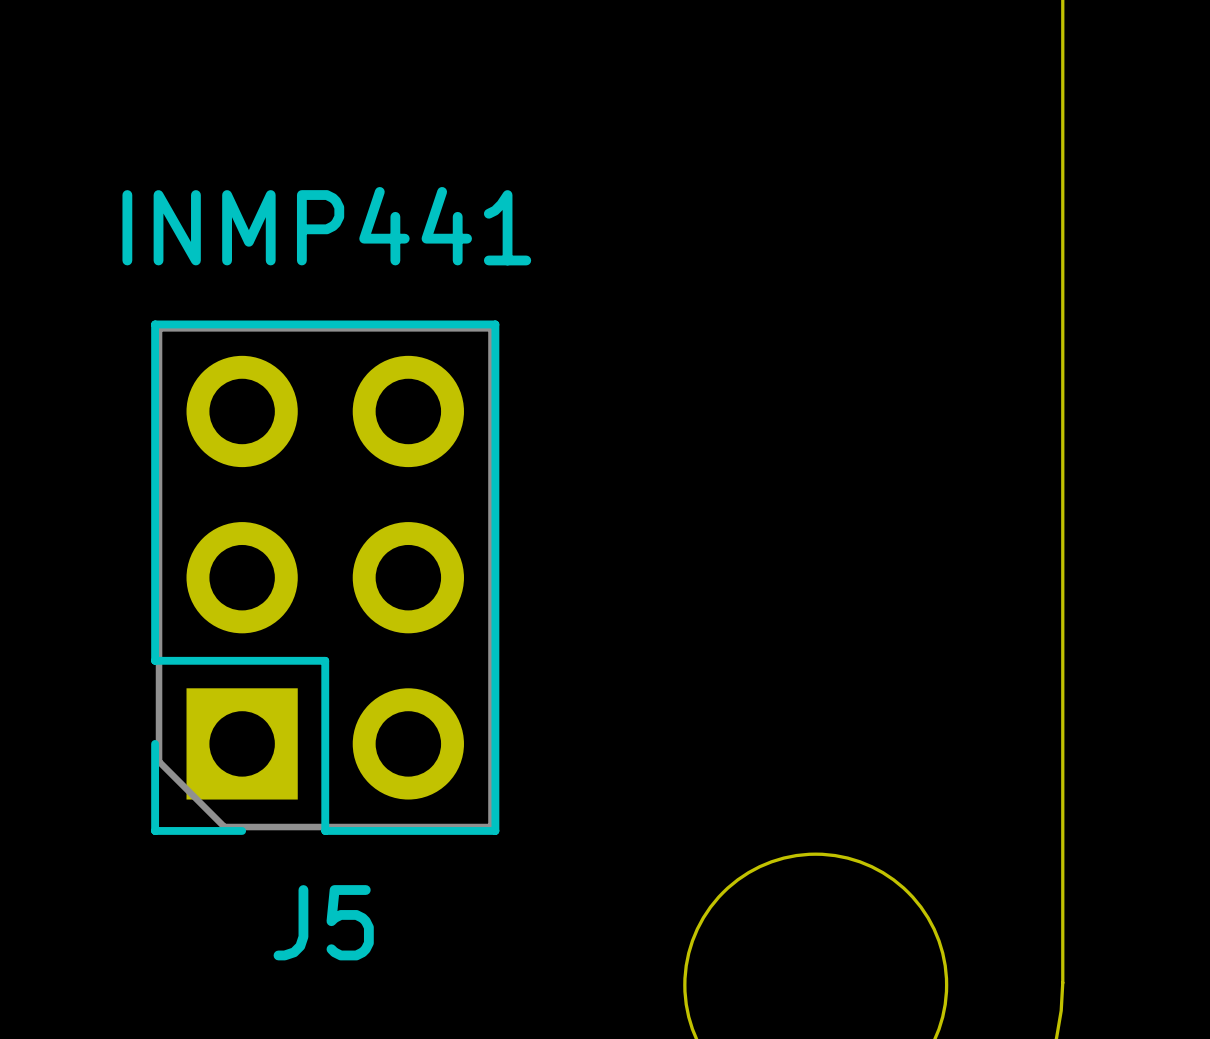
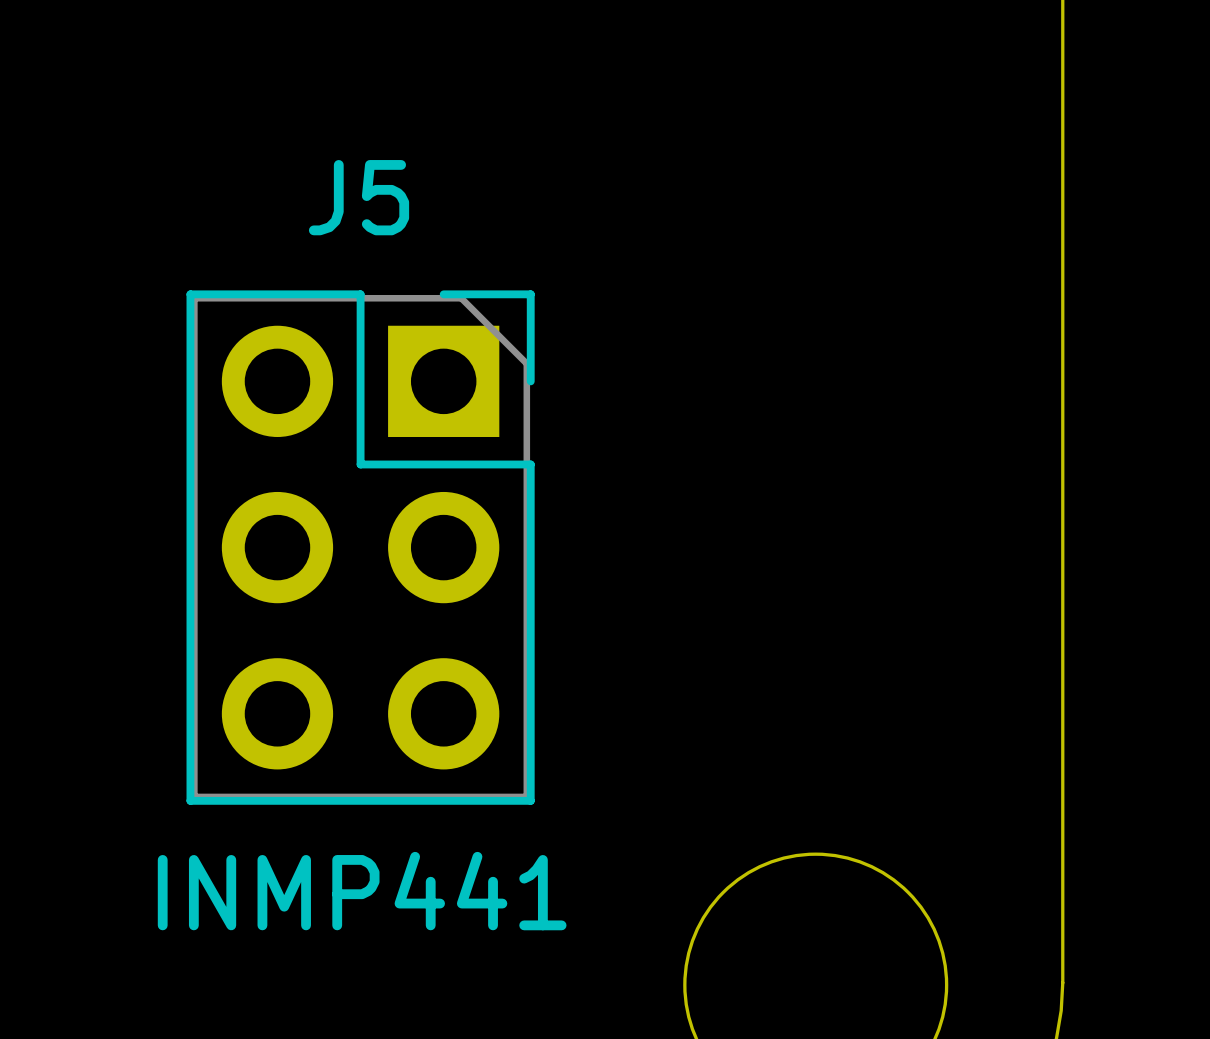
J5 rotation: 0° (325, 577) -> 180° (360, 547)

